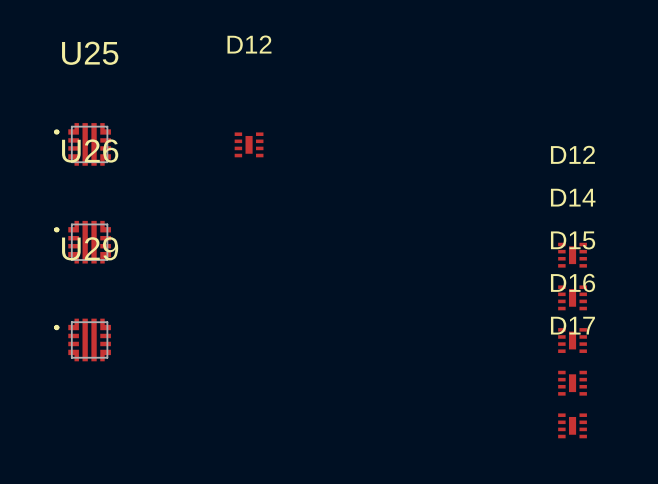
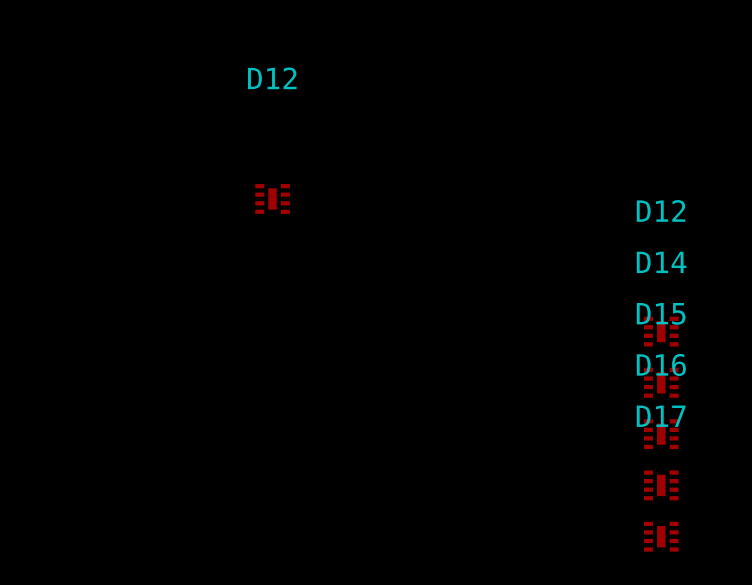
U25: (82, 144) -> none
U26: (82, 242) -> none
U29: (82, 339) -> none

